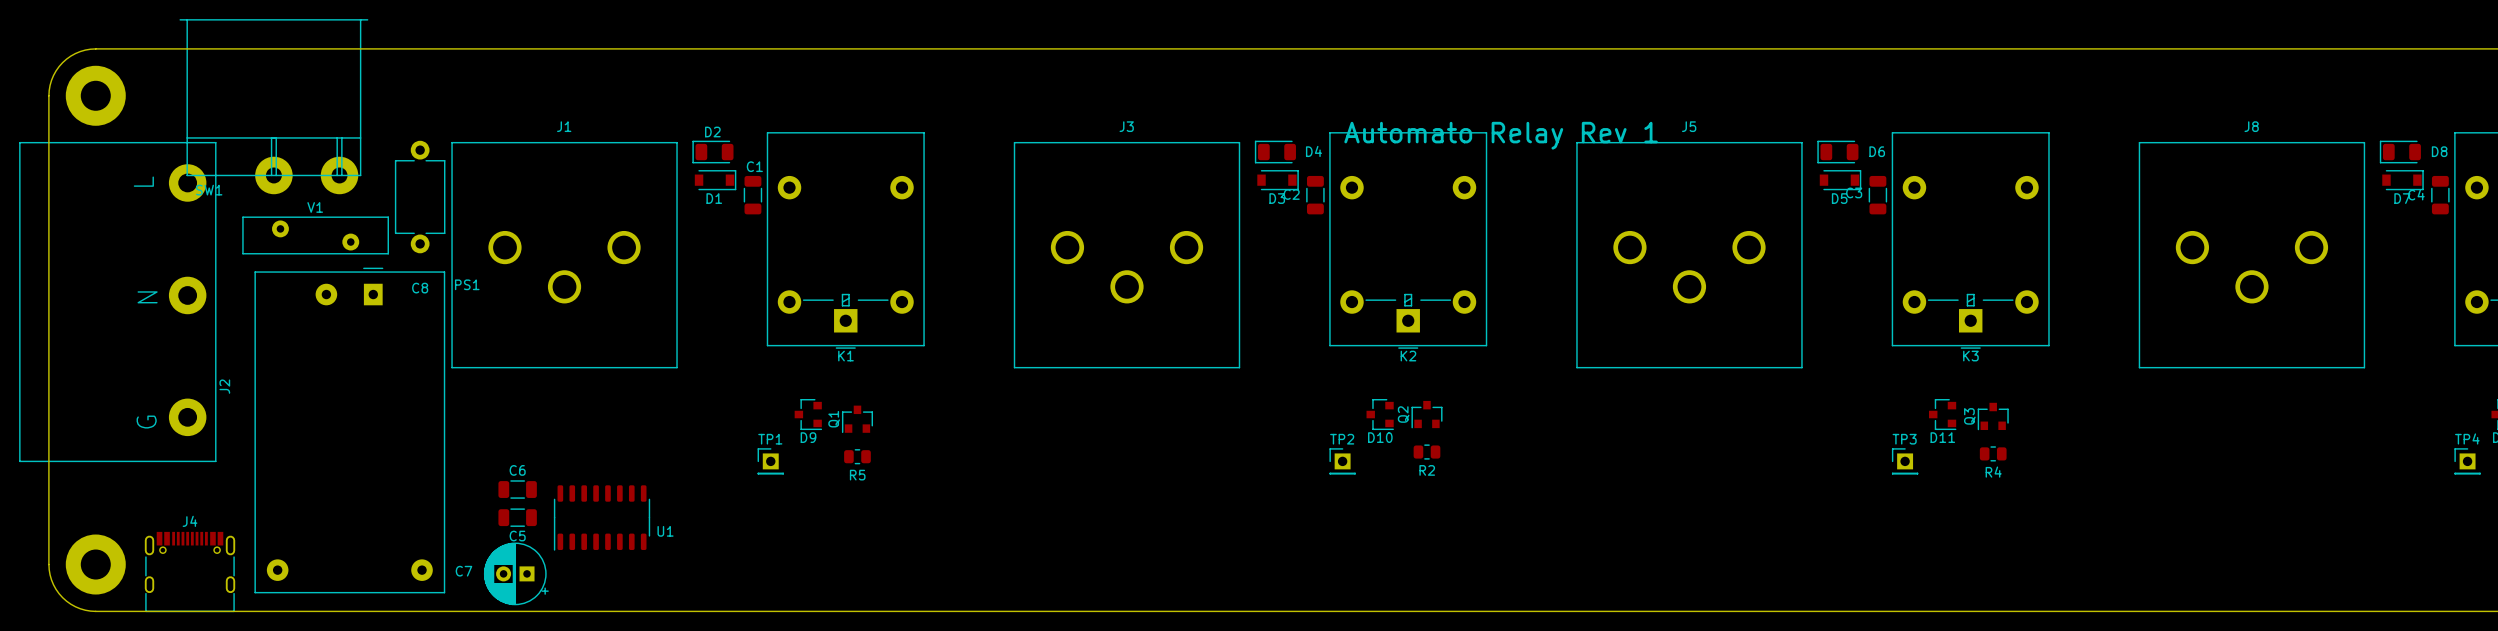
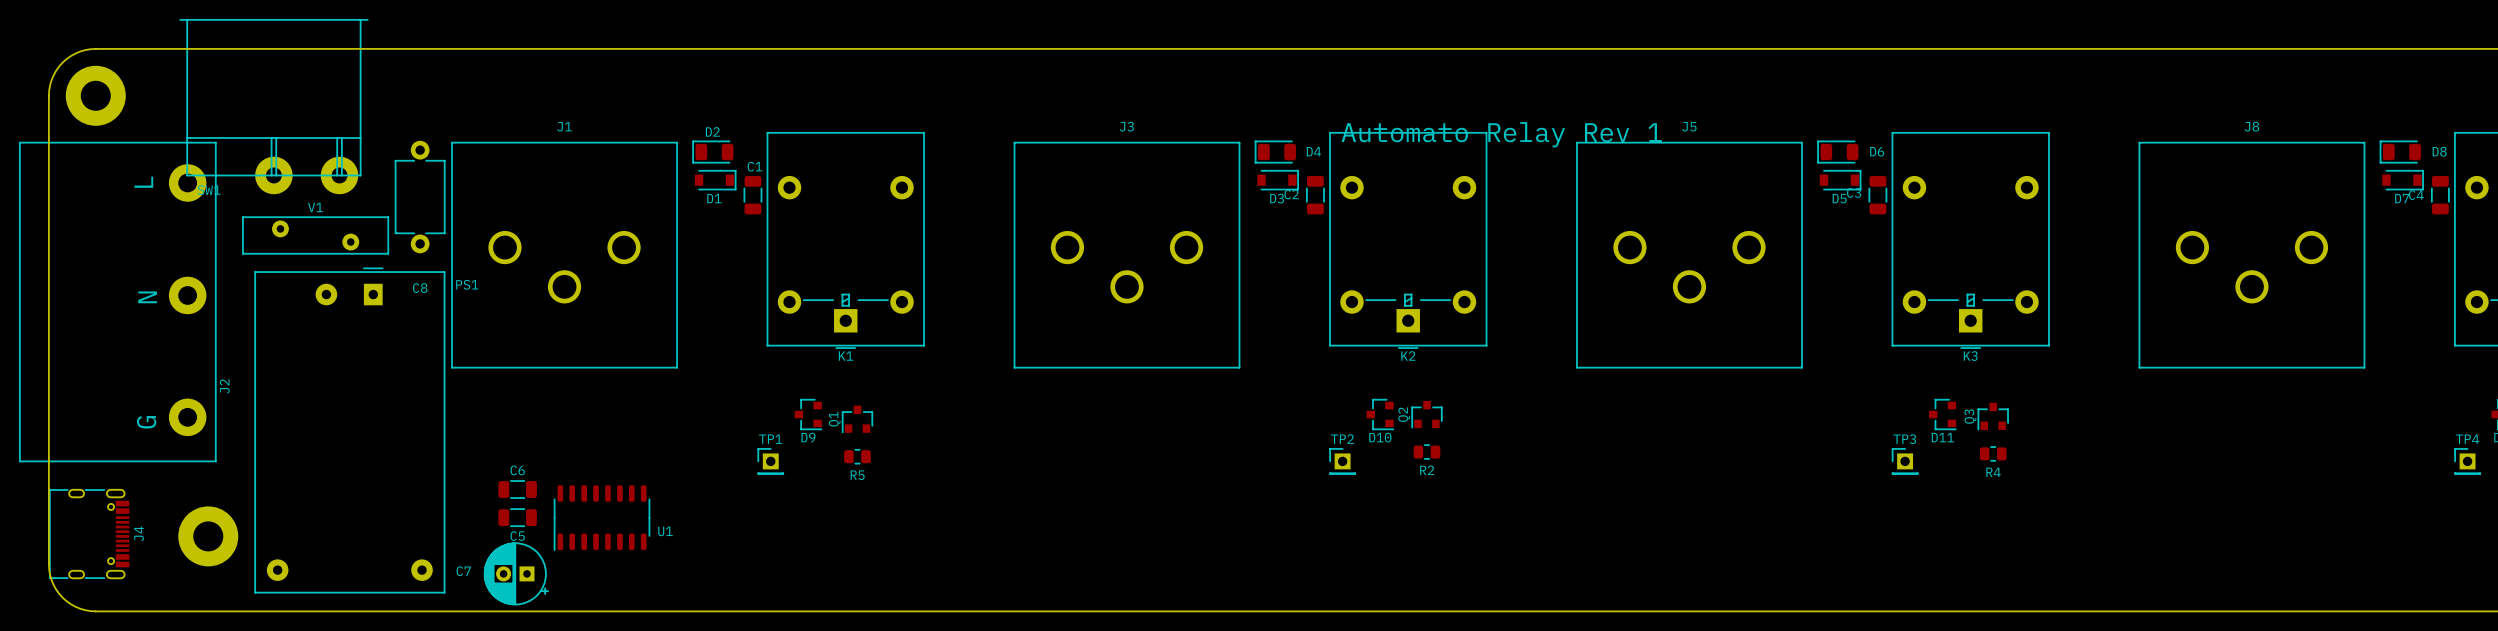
part position: (95, 564) -> (208, 536)
J4 rotation: 0° (190, 571) -> 90° clockwise (89, 534)
J4 position: (190, 571) -> (89, 534)

